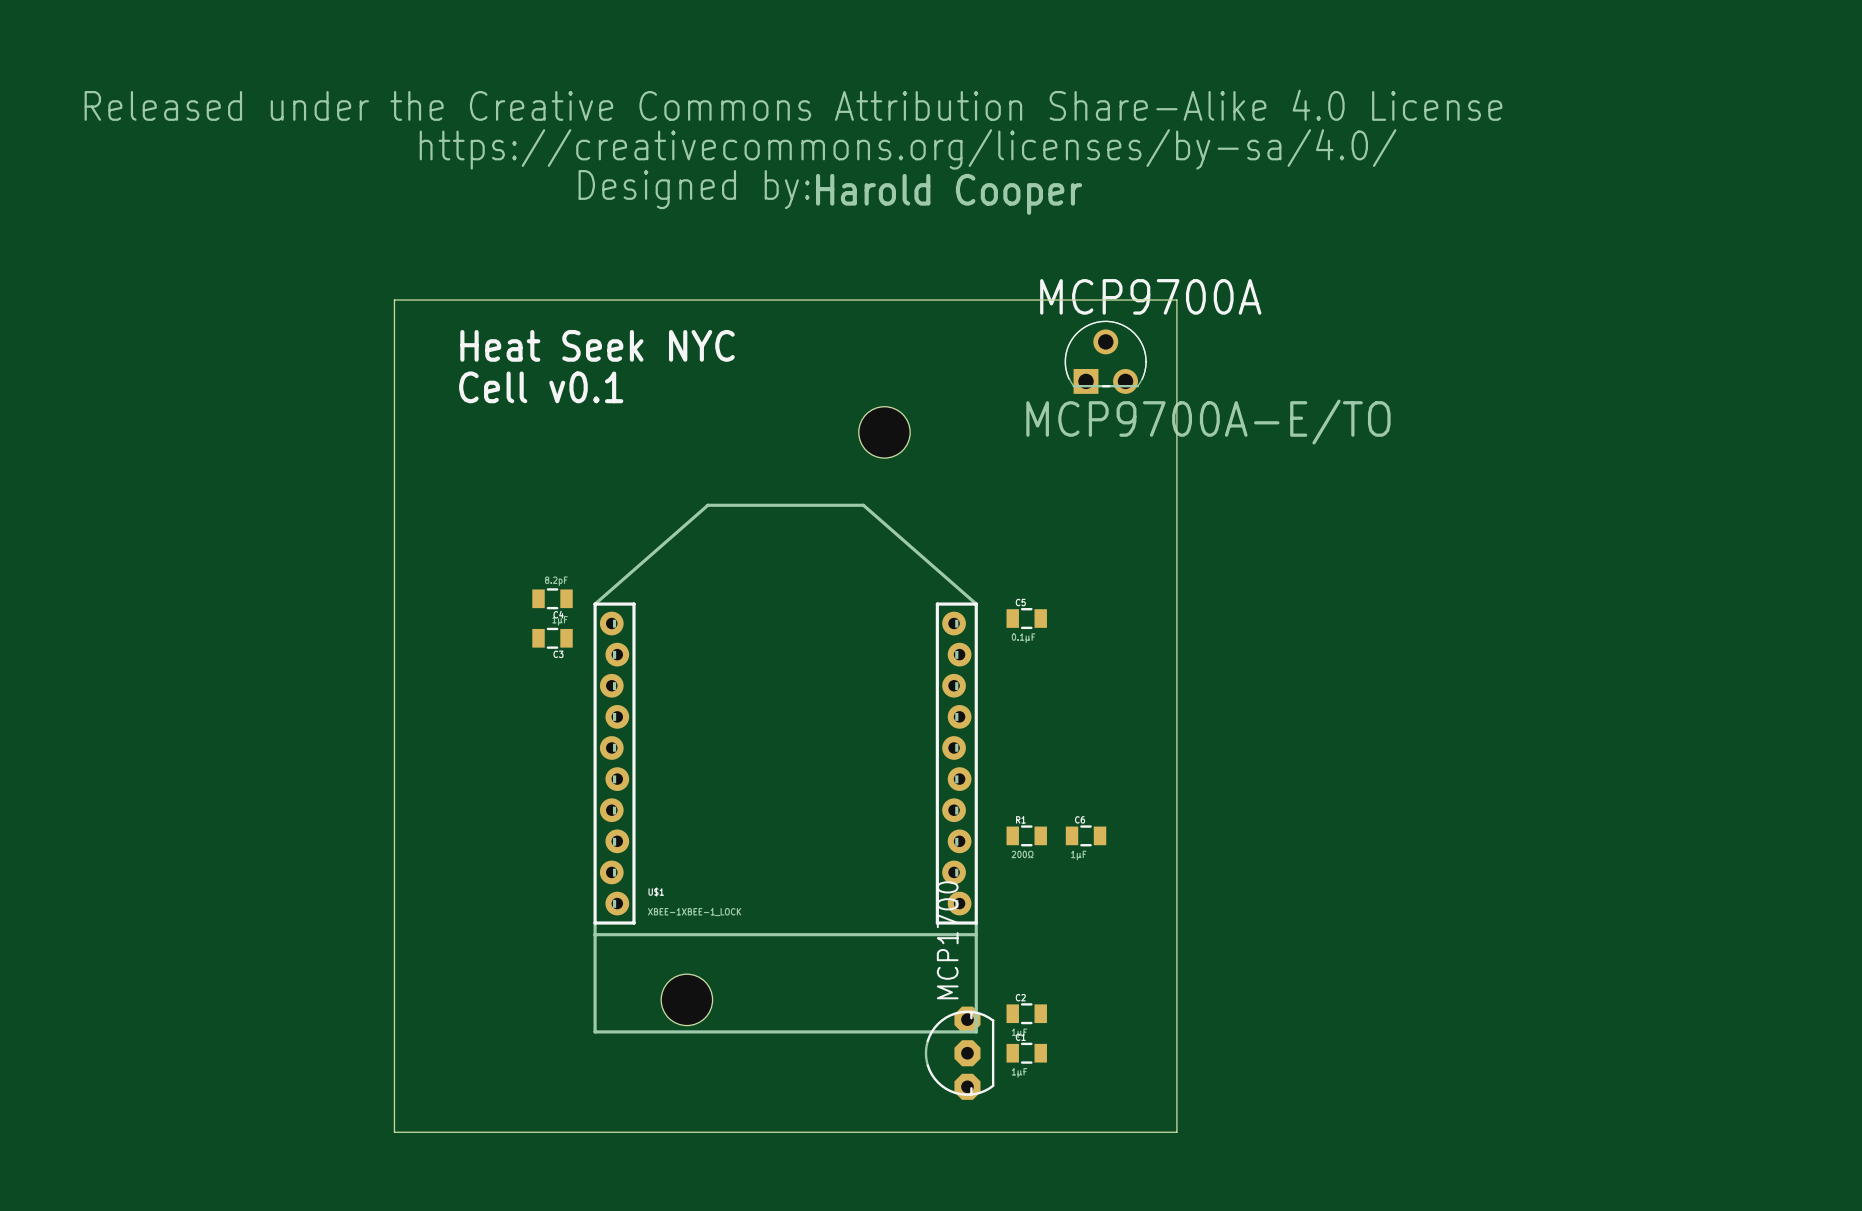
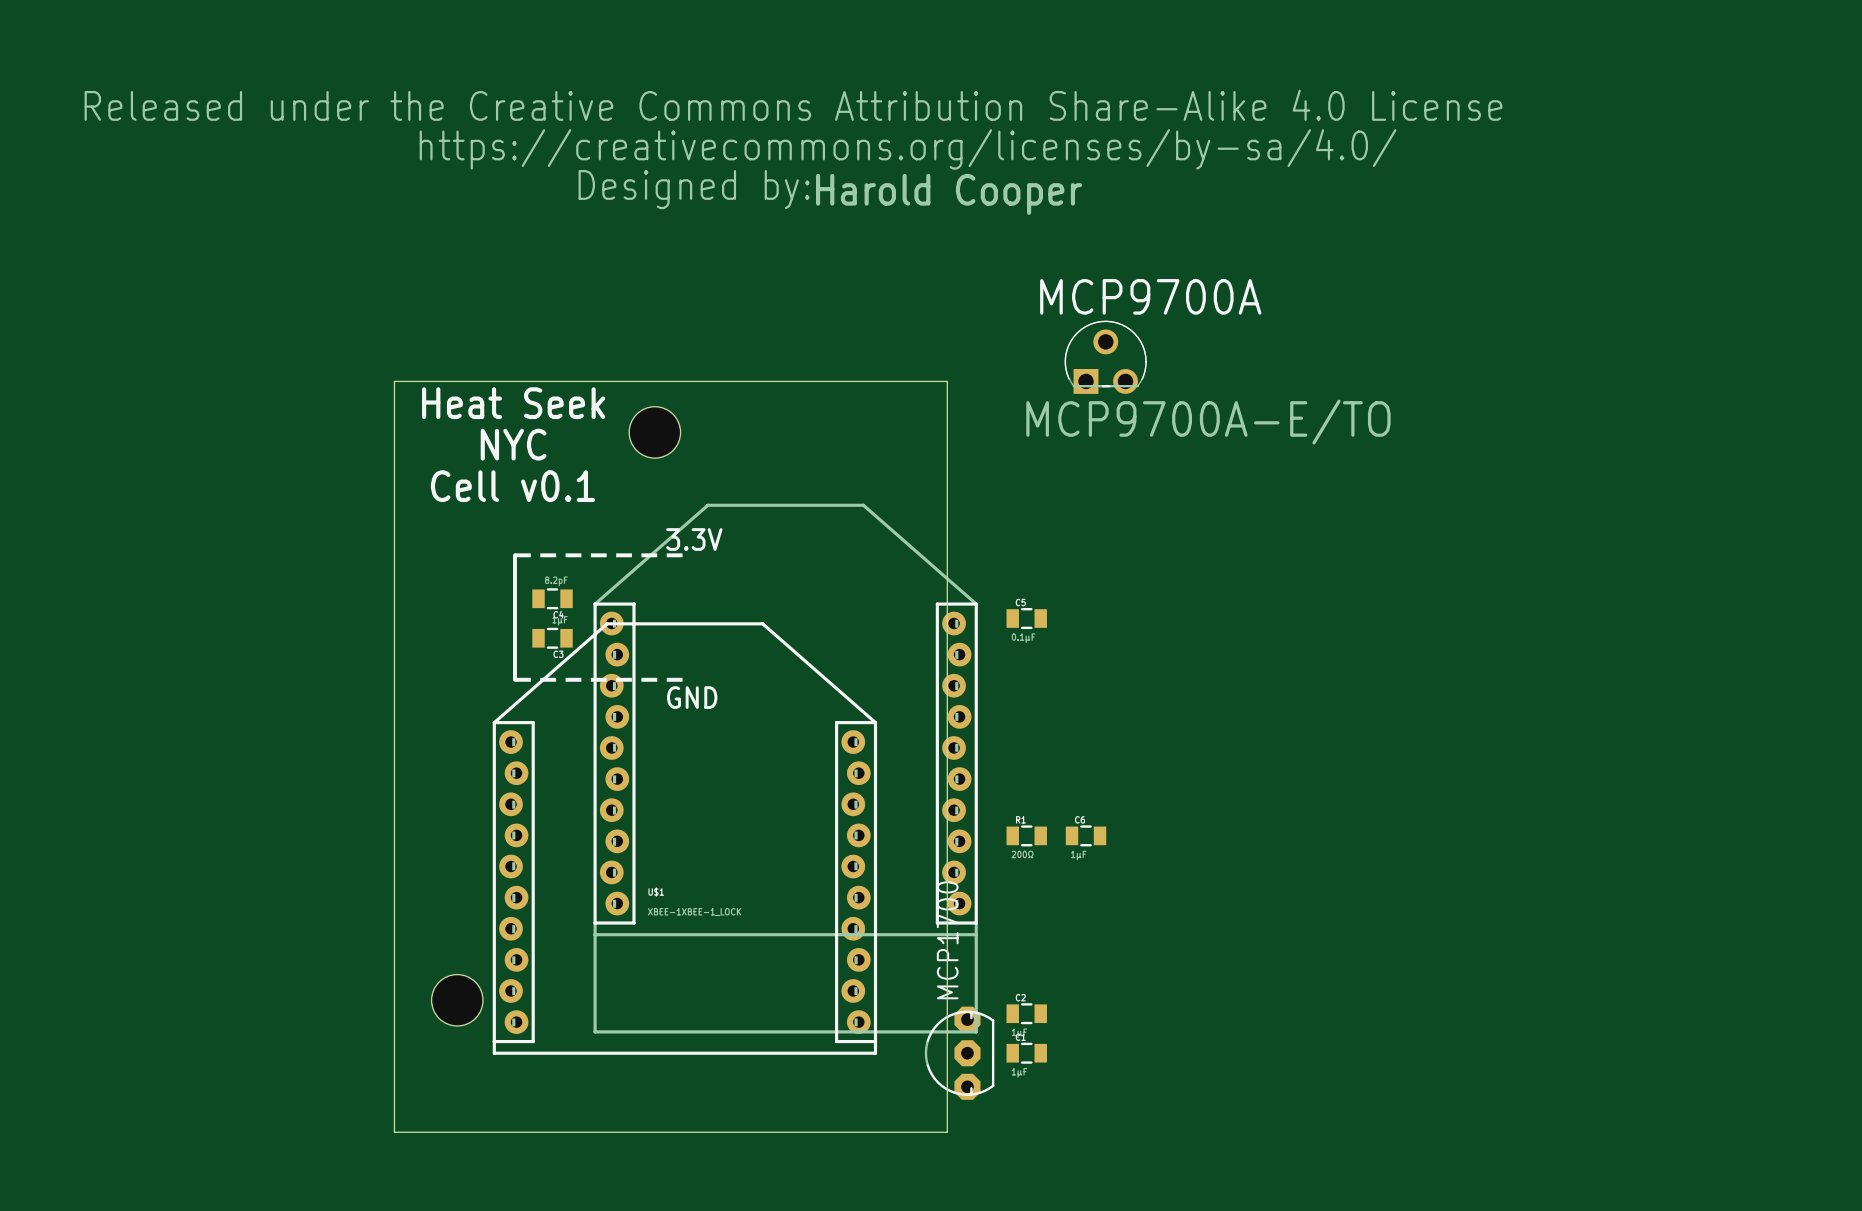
text: Heat Seek NYC (597, 345) -> Heat Seek (513, 403)
board edge: (394, 381) (394, 300) (1176, 300) (1176, 1132) (947, 1132) -> (394, 381) (947, 381) (947, 1132)
text position: Cell v0.1 (541, 387) -> Cell v0.1 (513, 486)
hole position: (884, 432) -> (654, 432)
text: none -> NYC (513, 444)
text: none -> 3.3V (694, 539)
line: none -> (684, 555) (514, 555) (514, 679) (684, 679)
text: none -> GND (692, 697)
part: none -> (684, 838)
hole position: (686, 999) -> (457, 1000)

